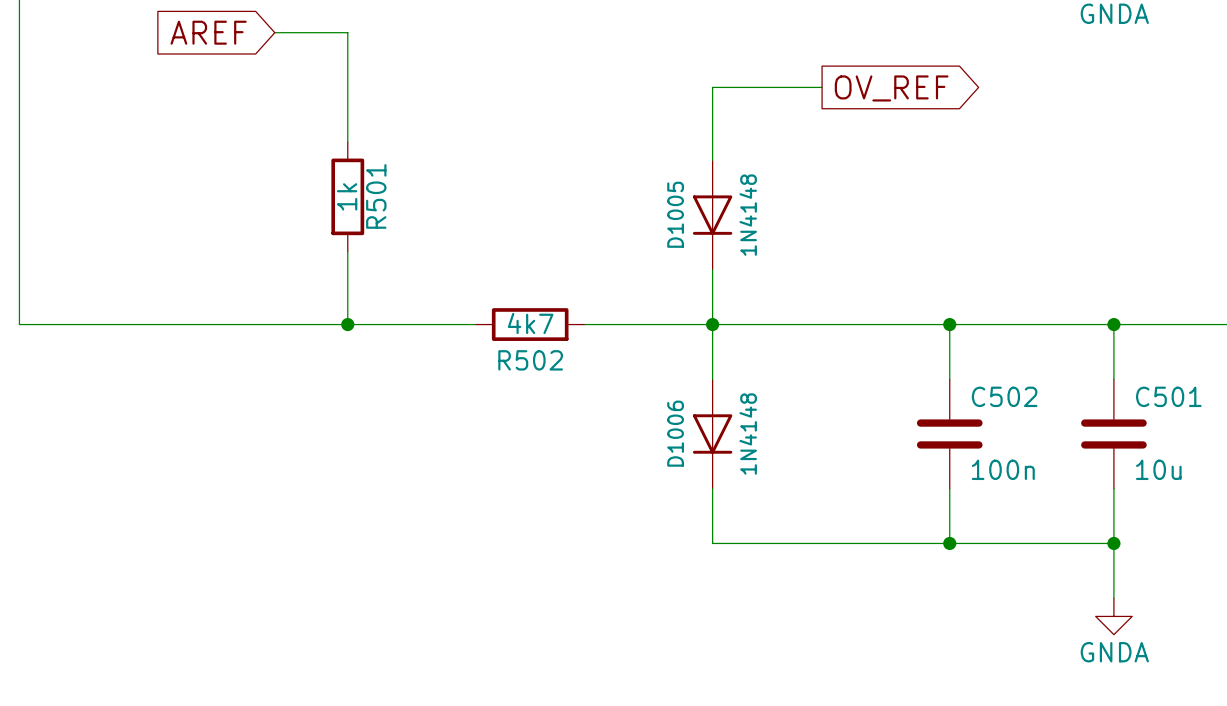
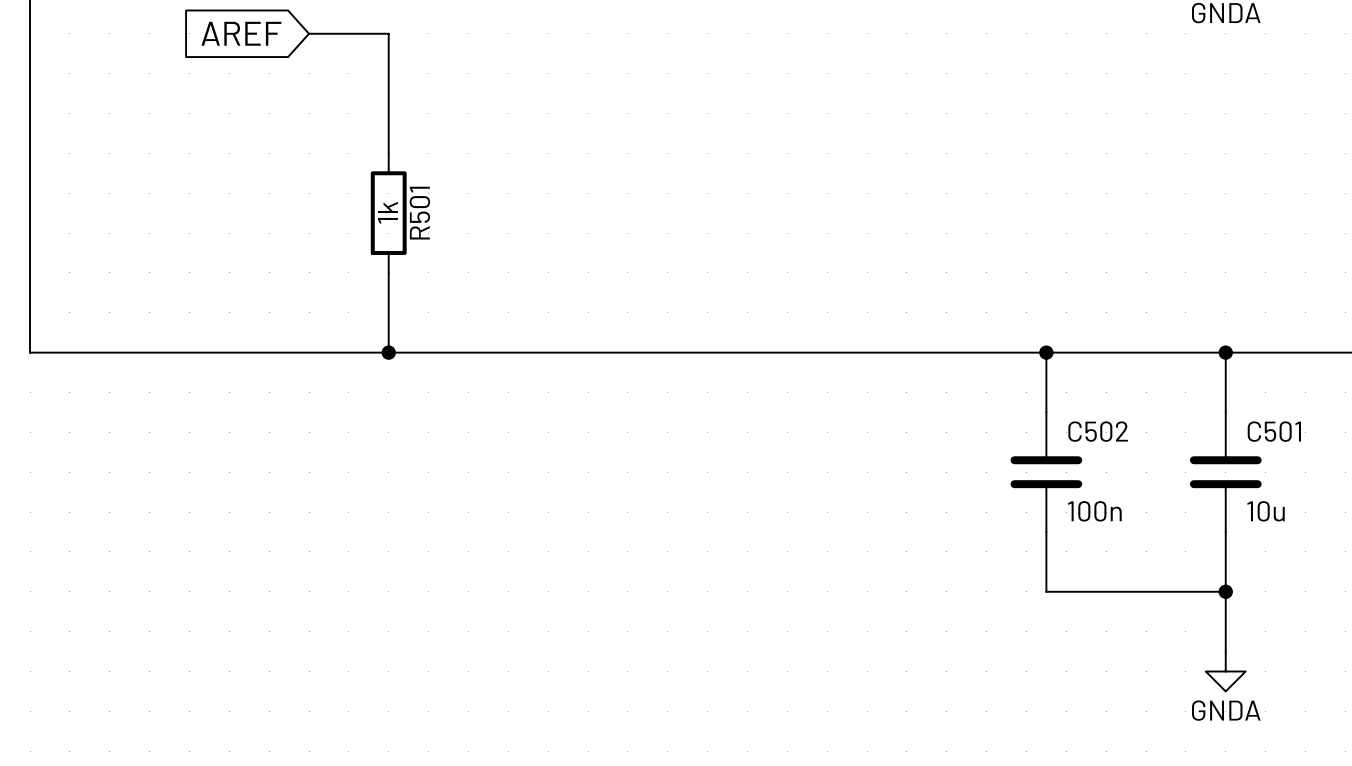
wire: (822, 87) (712, 87) (712, 160) -> none
global label: OV_REF (891, 88) -> none
D1005: 1N4148 (712, 215) -> none
wire: (712, 269) (712, 379) -> none
wire: none -> (528, 352) (647, 352)
R502: 4k7 (530, 324) -> none
junction: (712, 324) -> none
D1006: 1N4148 (712, 434) -> none
wire: (712, 488) (712, 543) (949, 543) -> none
junction: (949, 543) -> none

